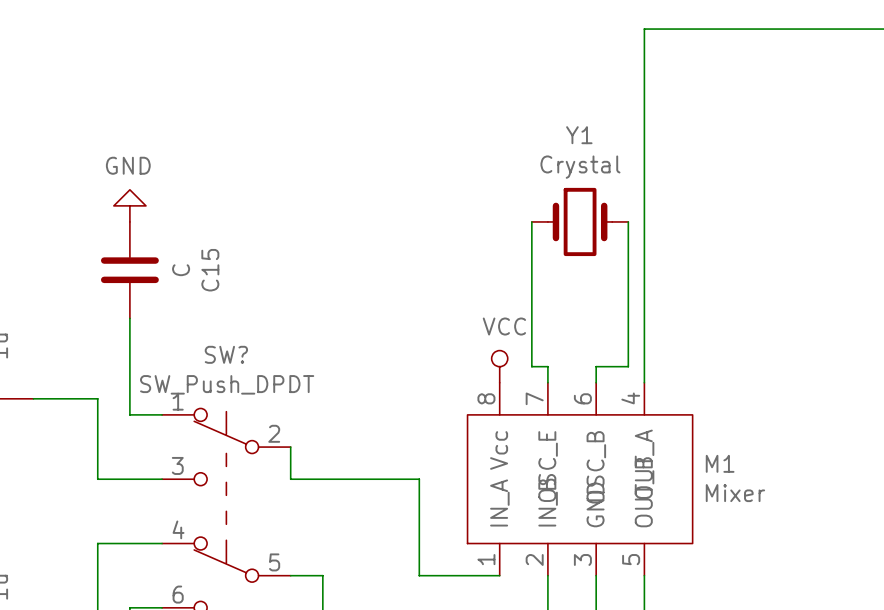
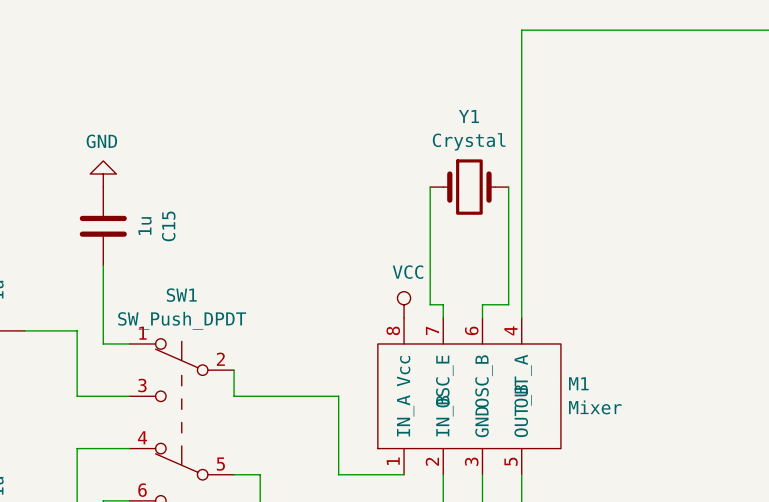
C15 value: C (181, 270) -> 1u (145, 226)
SW? name: SW? (226, 354) -> SW1 (181, 295)

